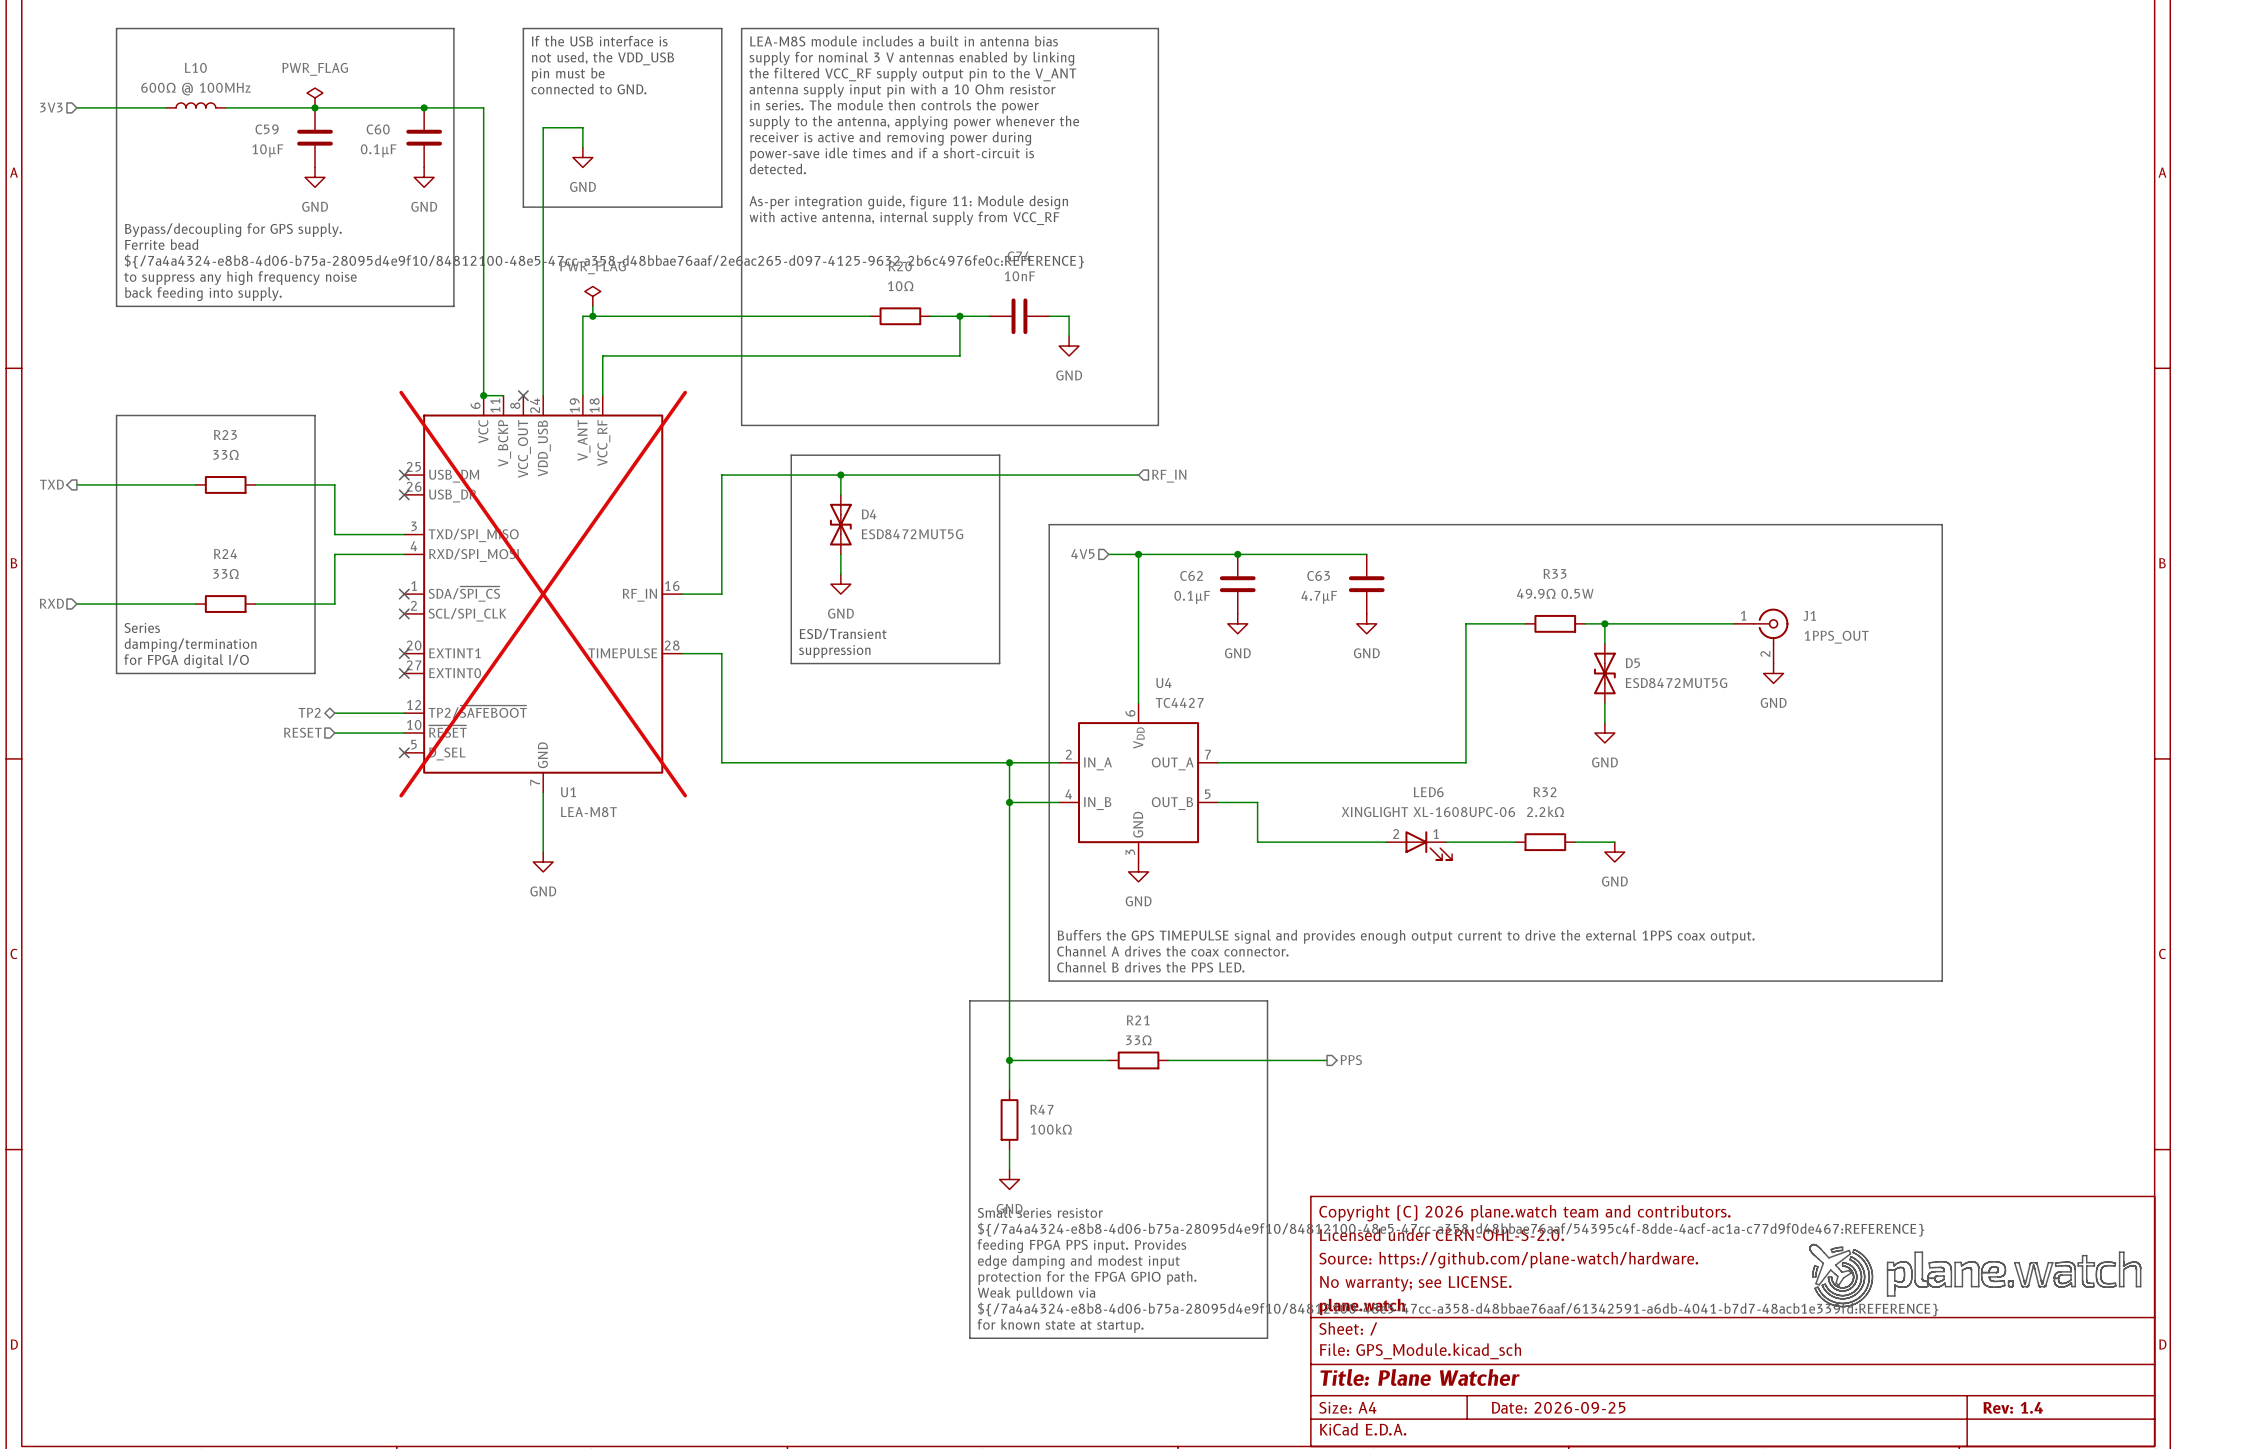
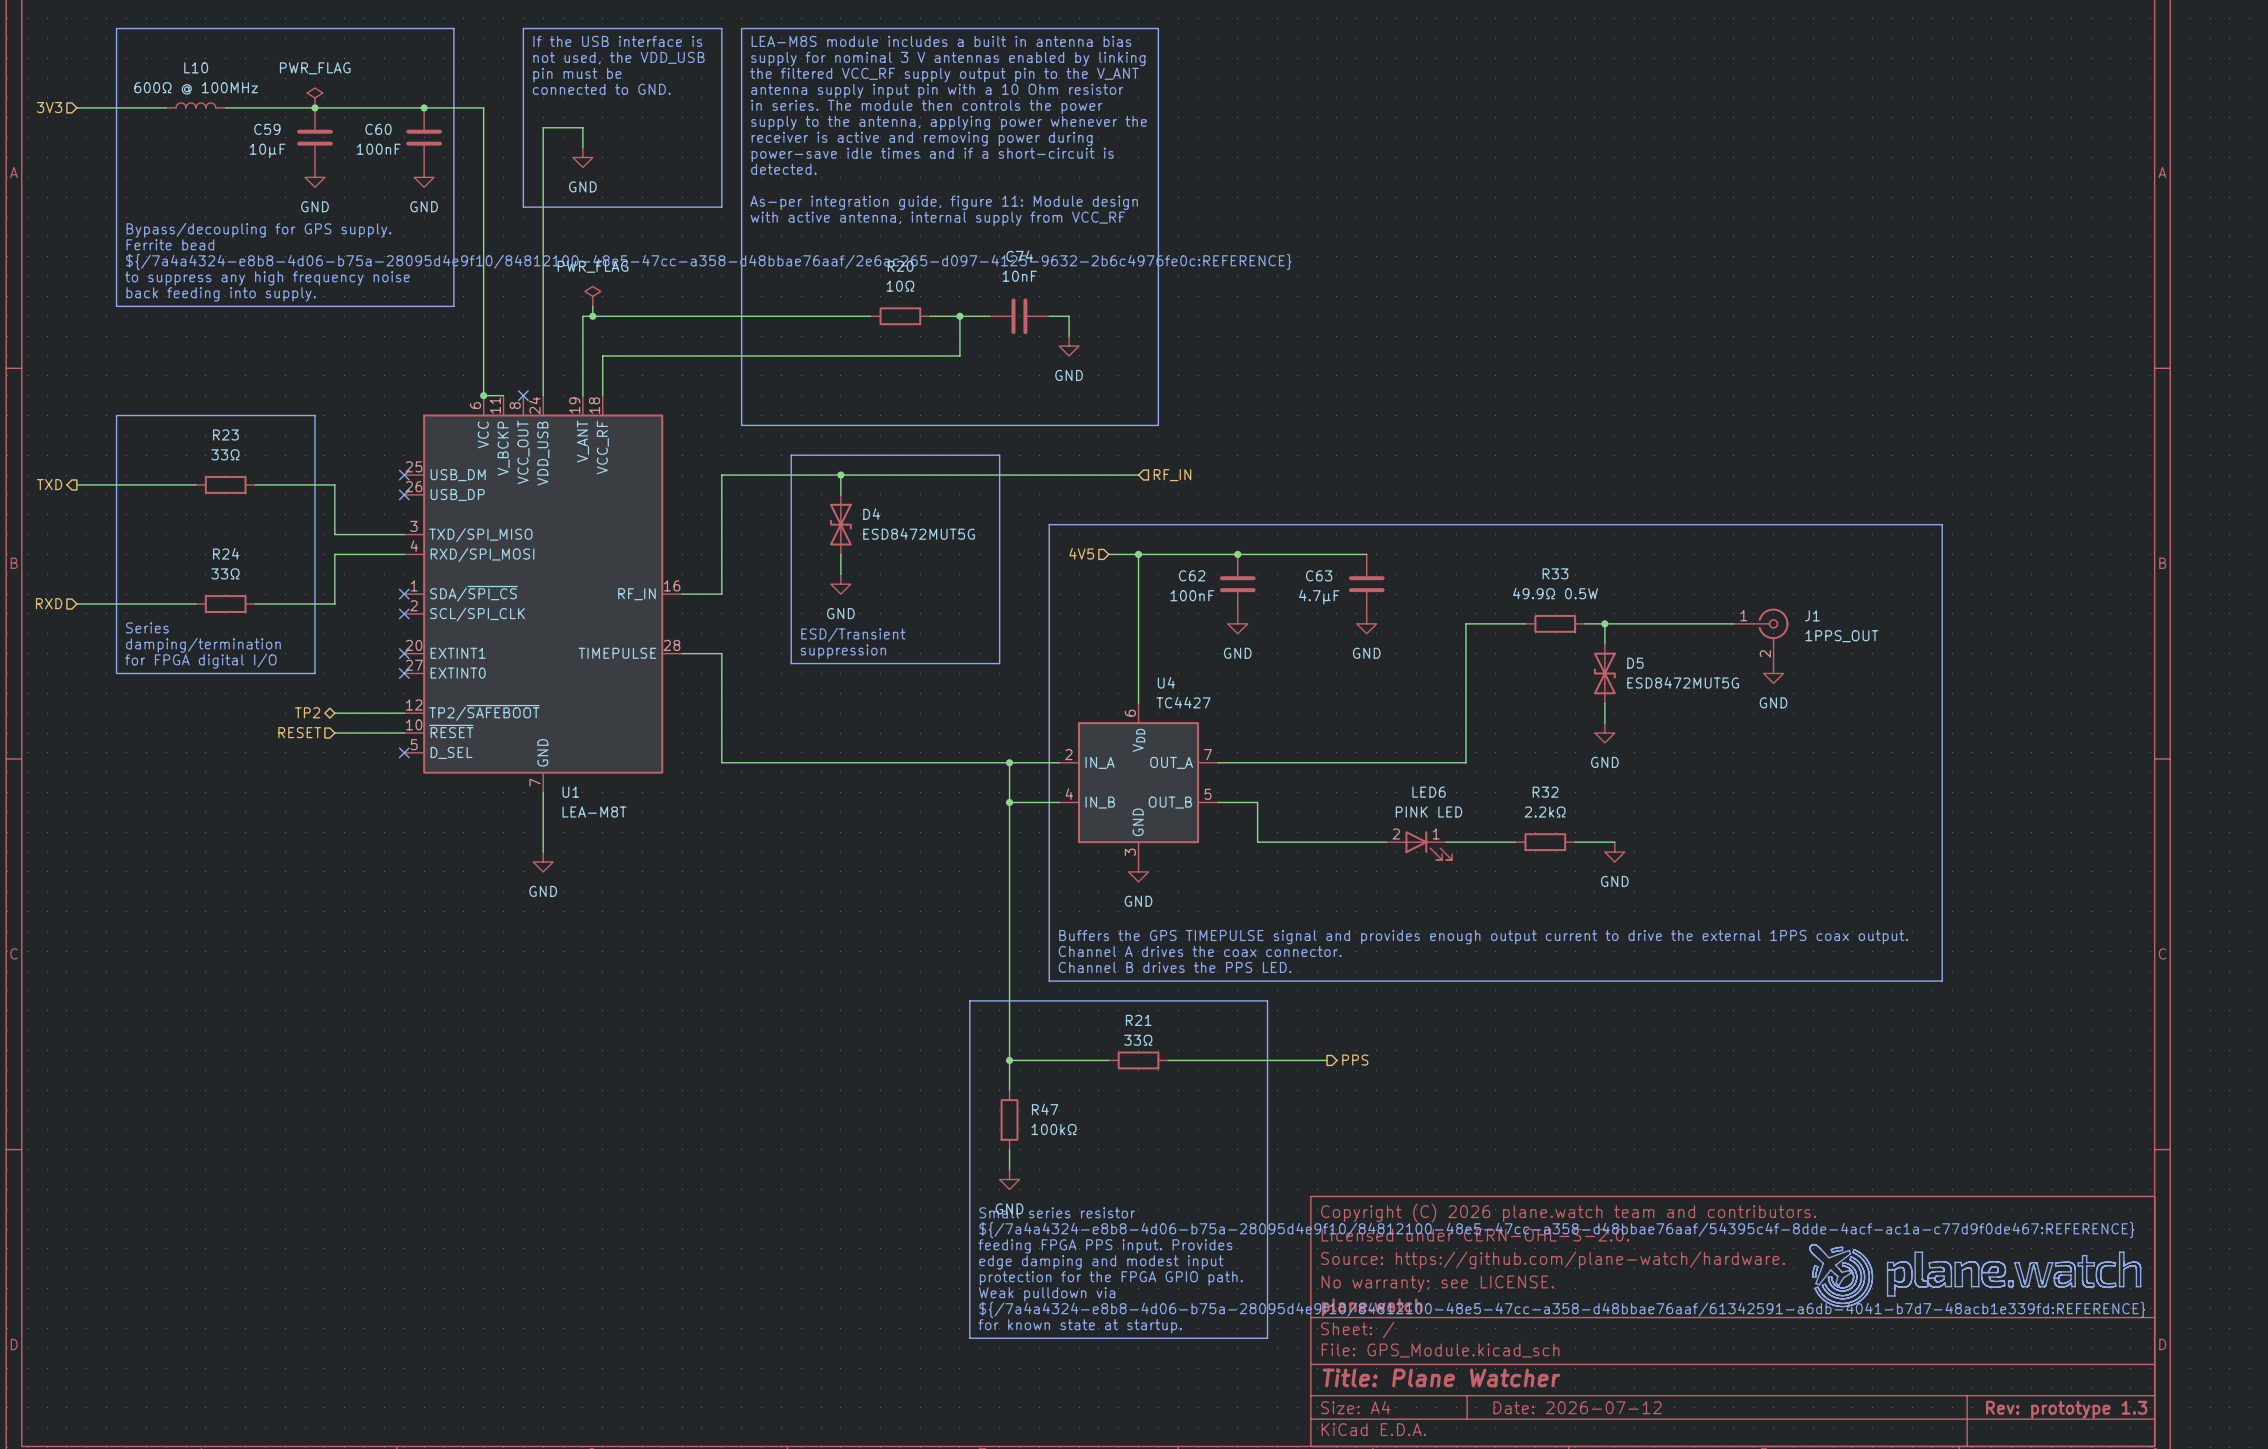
C60 value: 0.1µF (378, 150) -> 100nF (378, 149)
U1 do-not-place cross: (543, 594) -> none
C62 value: 0.1µF (1192, 597) -> 100nF (1192, 595)
LED6 value: XINGLIGHT XL-1608UPC-06 (1428, 812) -> PINK LED (1428, 812)
title block: Date: 2026-09-25 (1558, 1407) -> Date: 2026-07-12 (1577, 1407)
title block: Rev: 1.4 (2013, 1407) -> Rev: prototype 1.3 (2066, 1409)

